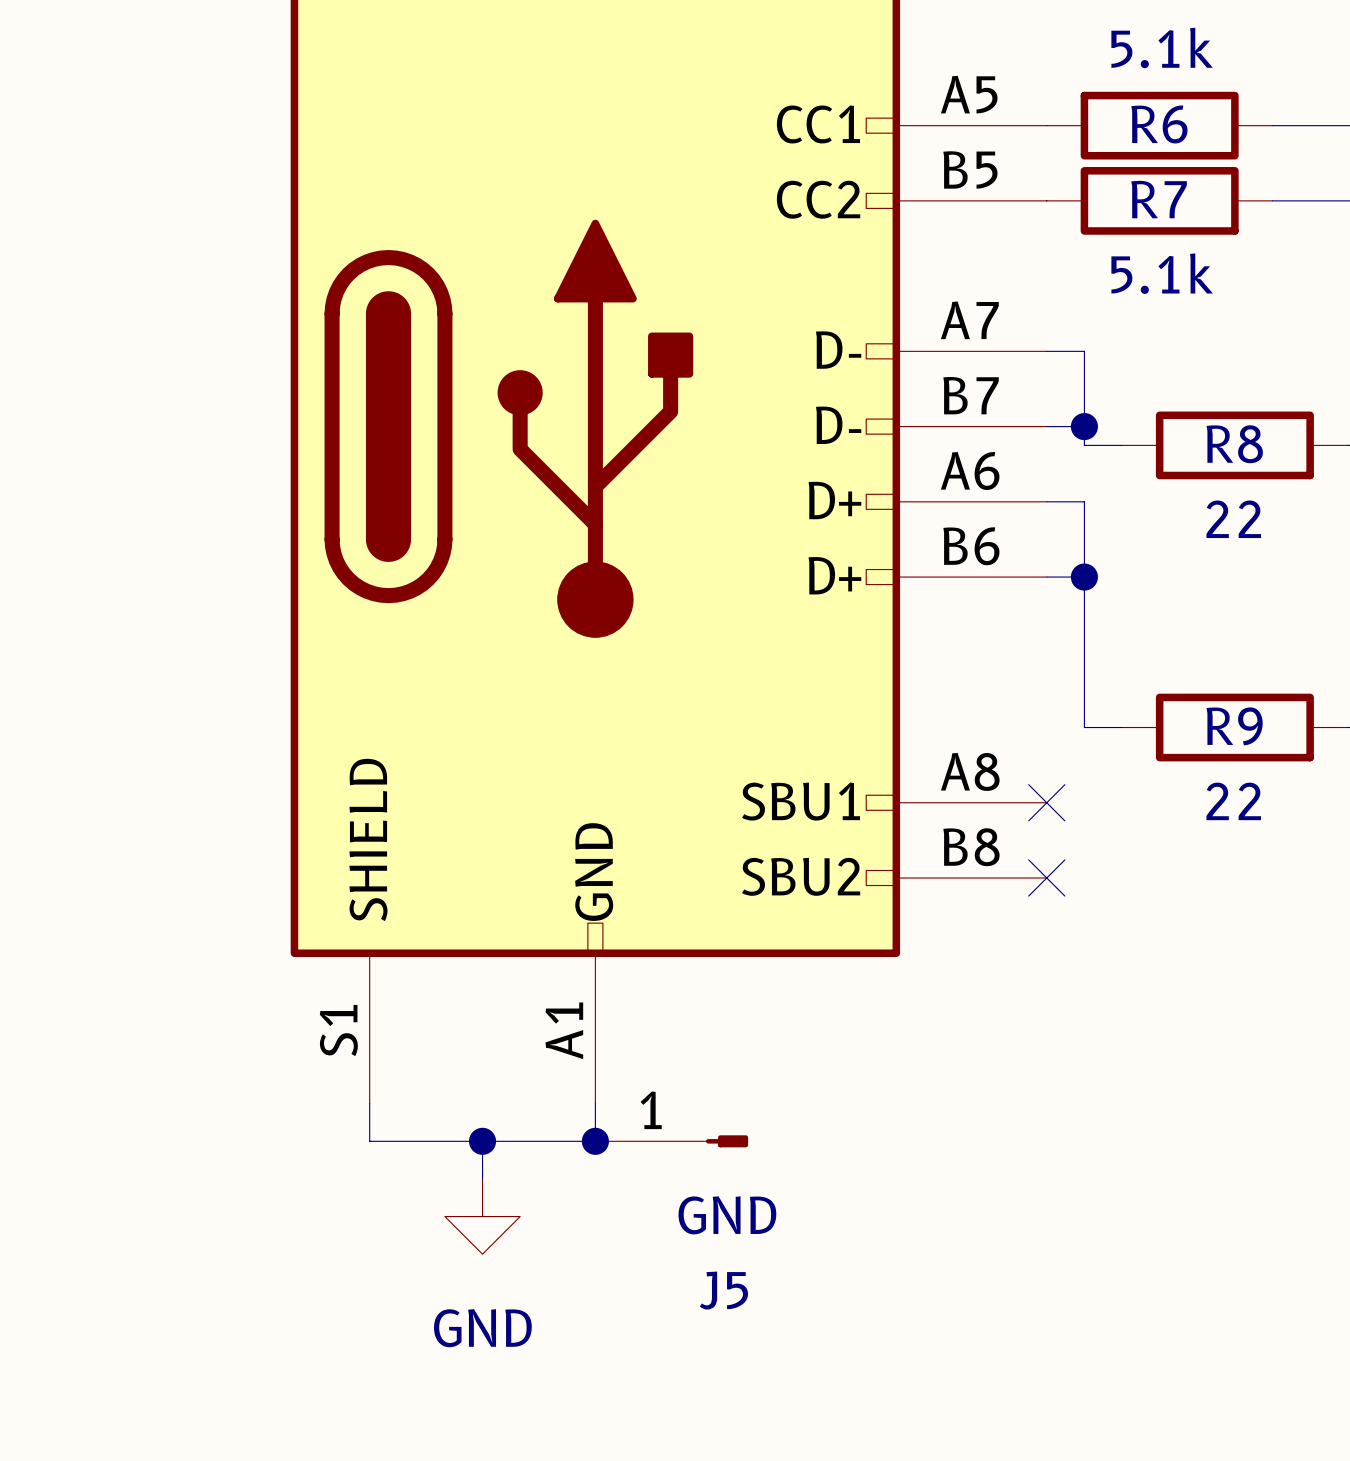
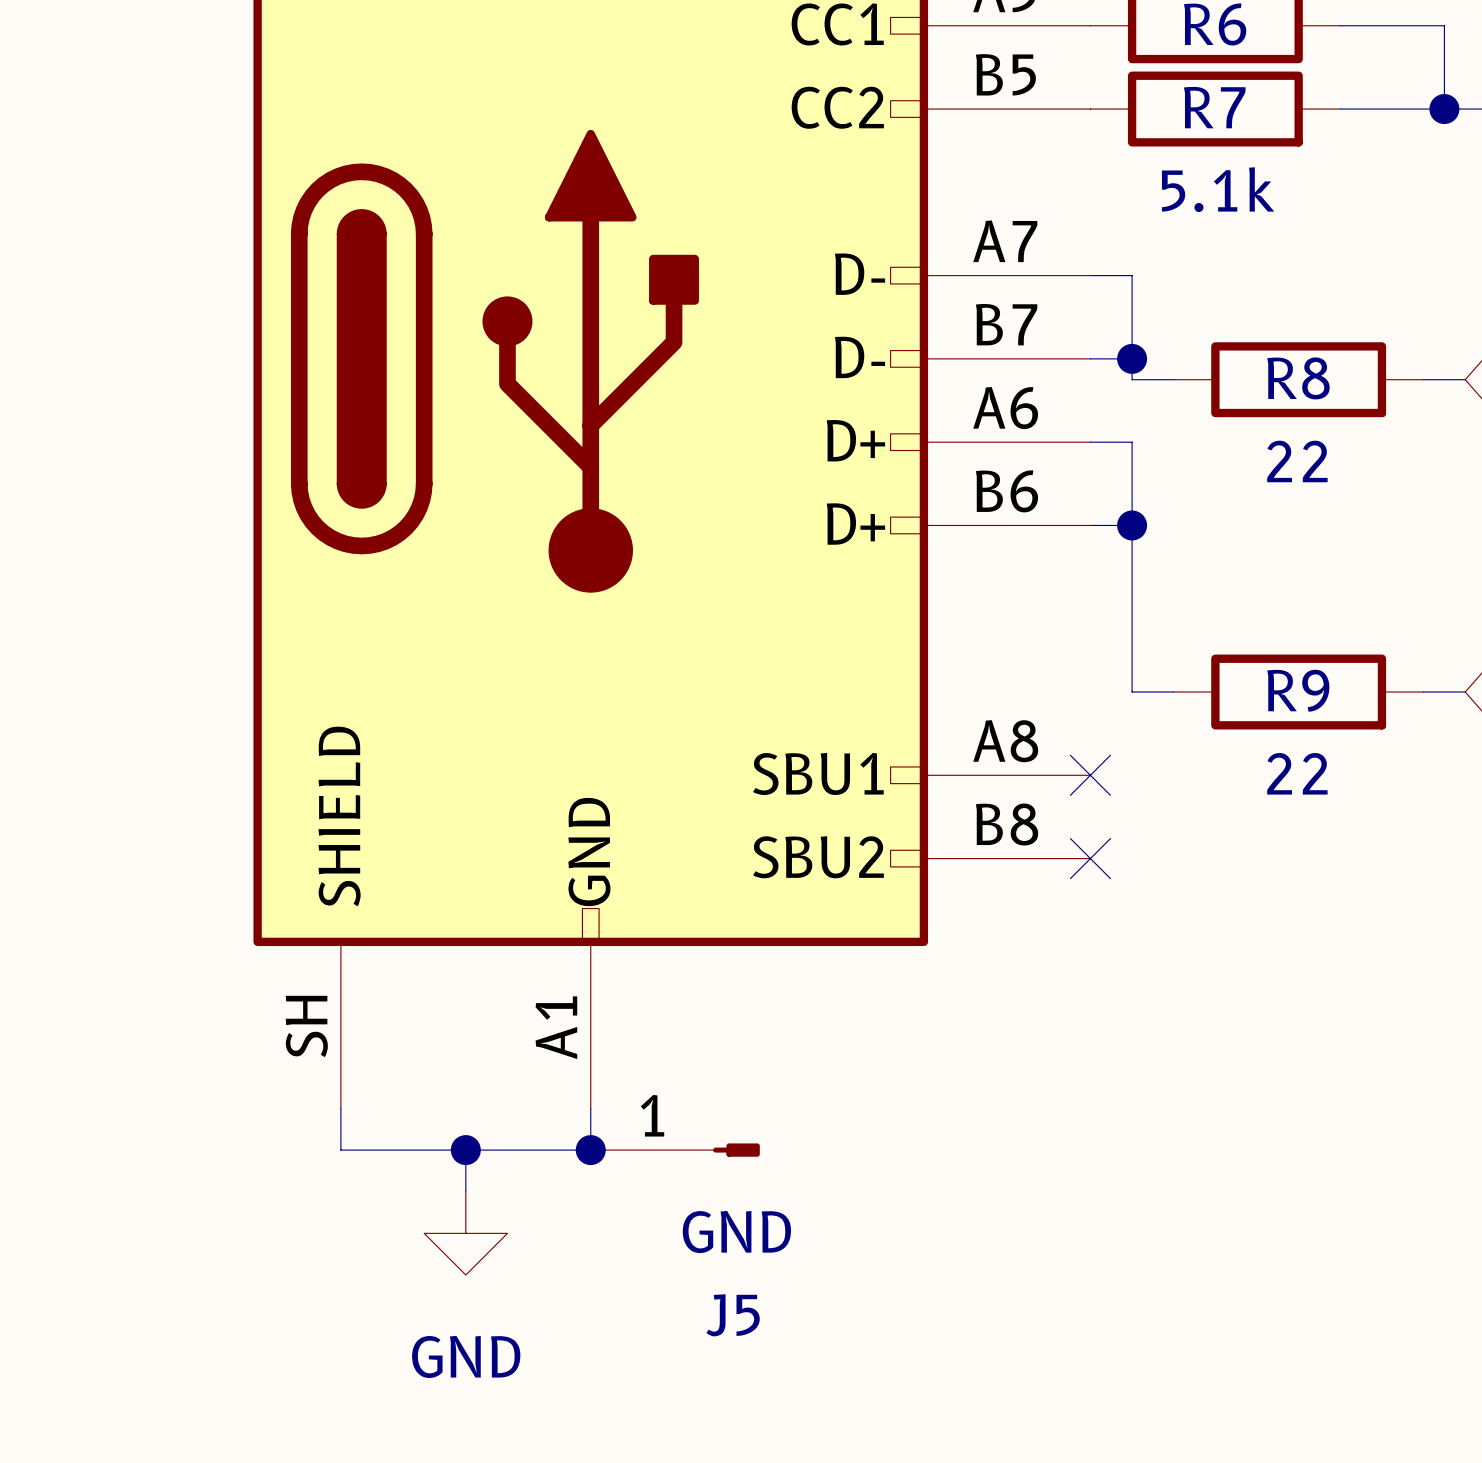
part pin number: S1 (338, 1030) -> SH (306, 1026)

